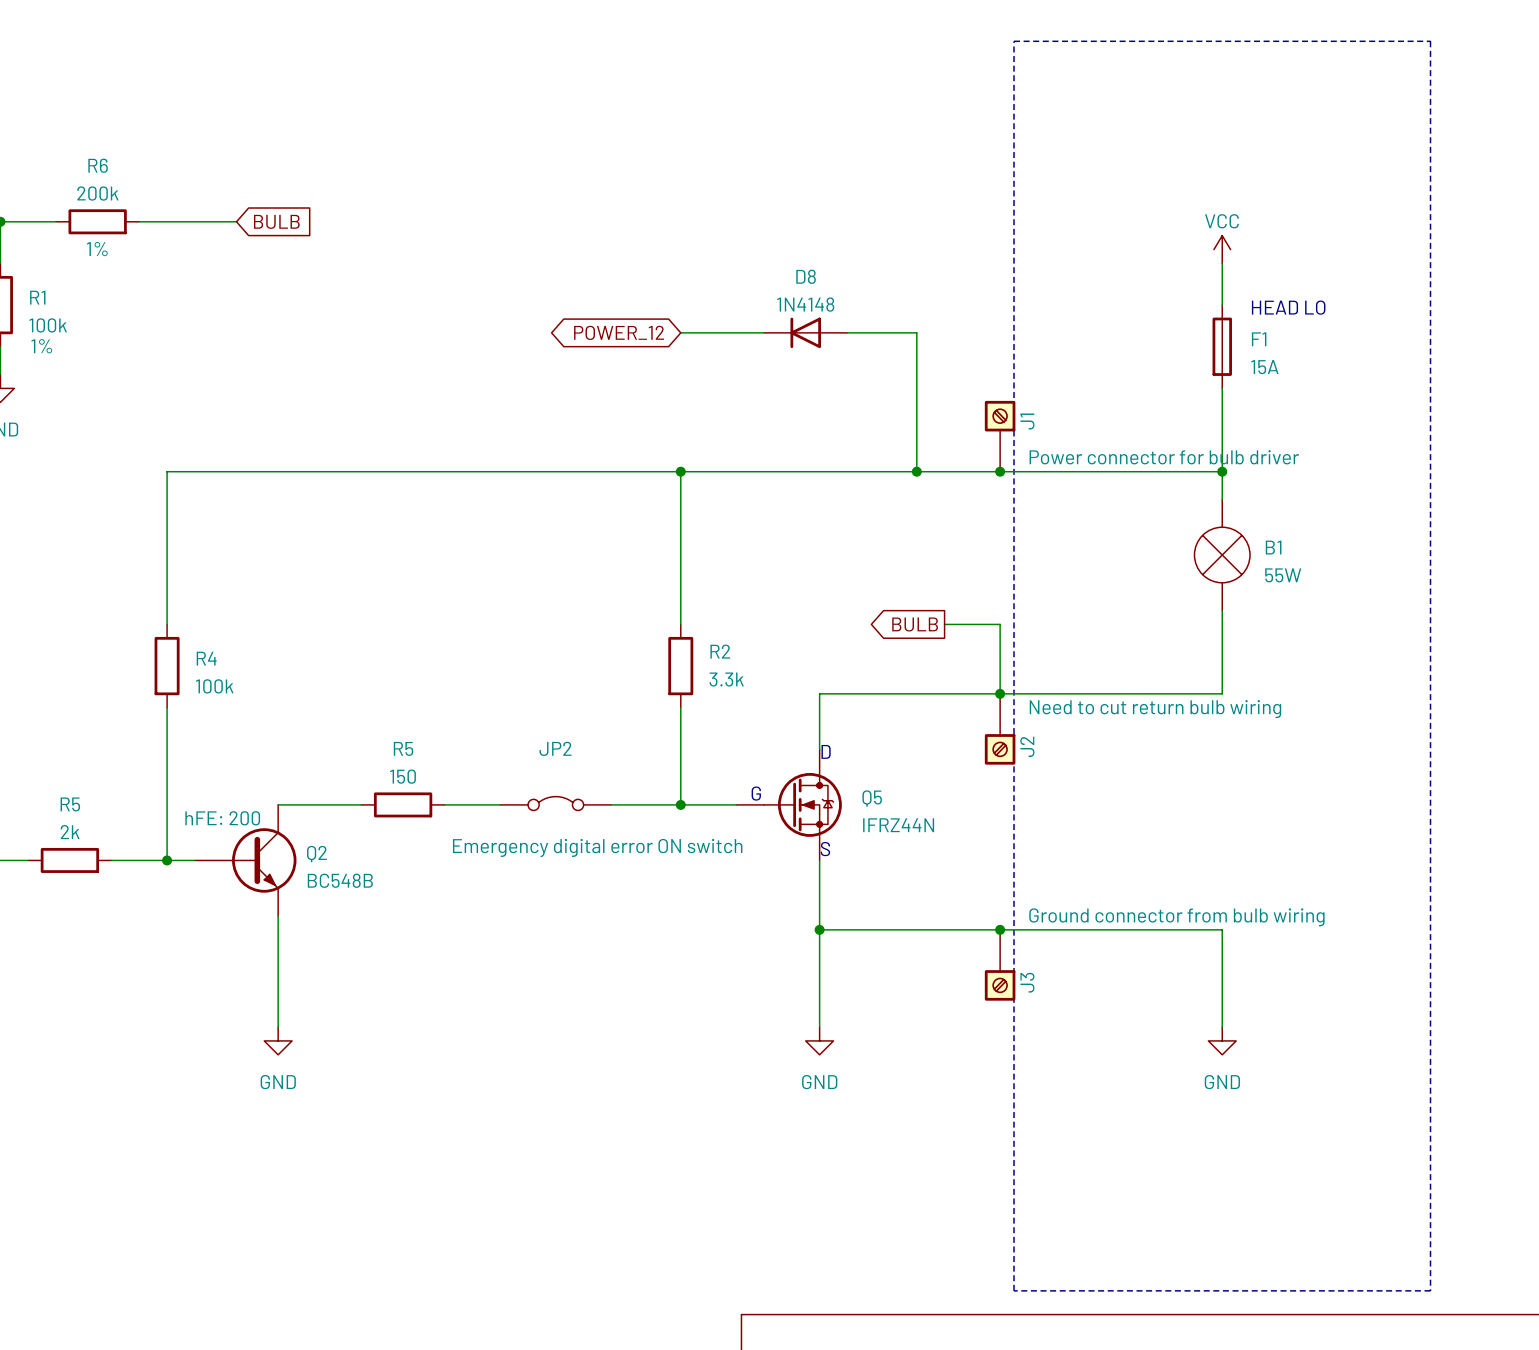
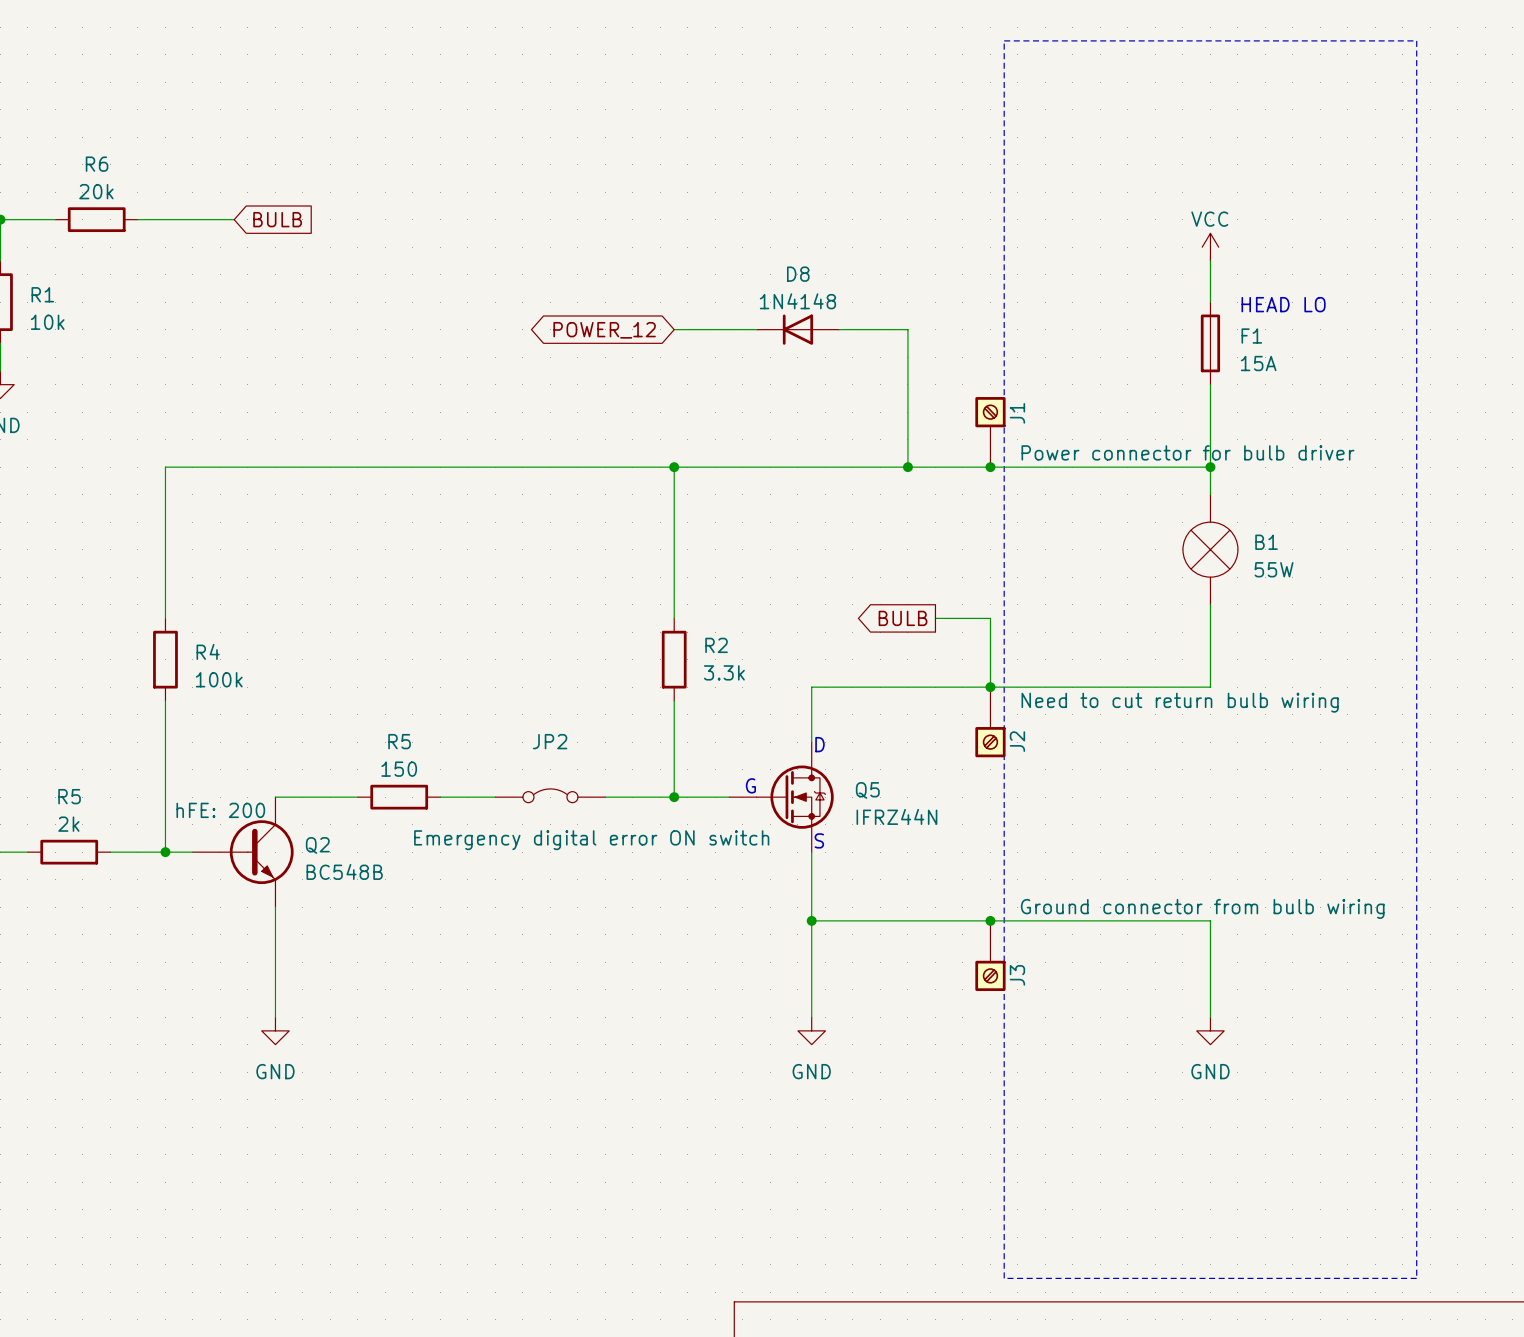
R6 value: 200k (97, 193) -> 20k (96, 191)
R6 text: 1% (97, 249) -> none
R1 value: 100k (48, 325) -> 10k (47, 322)
R1 text: 1% (41, 346) -> none

